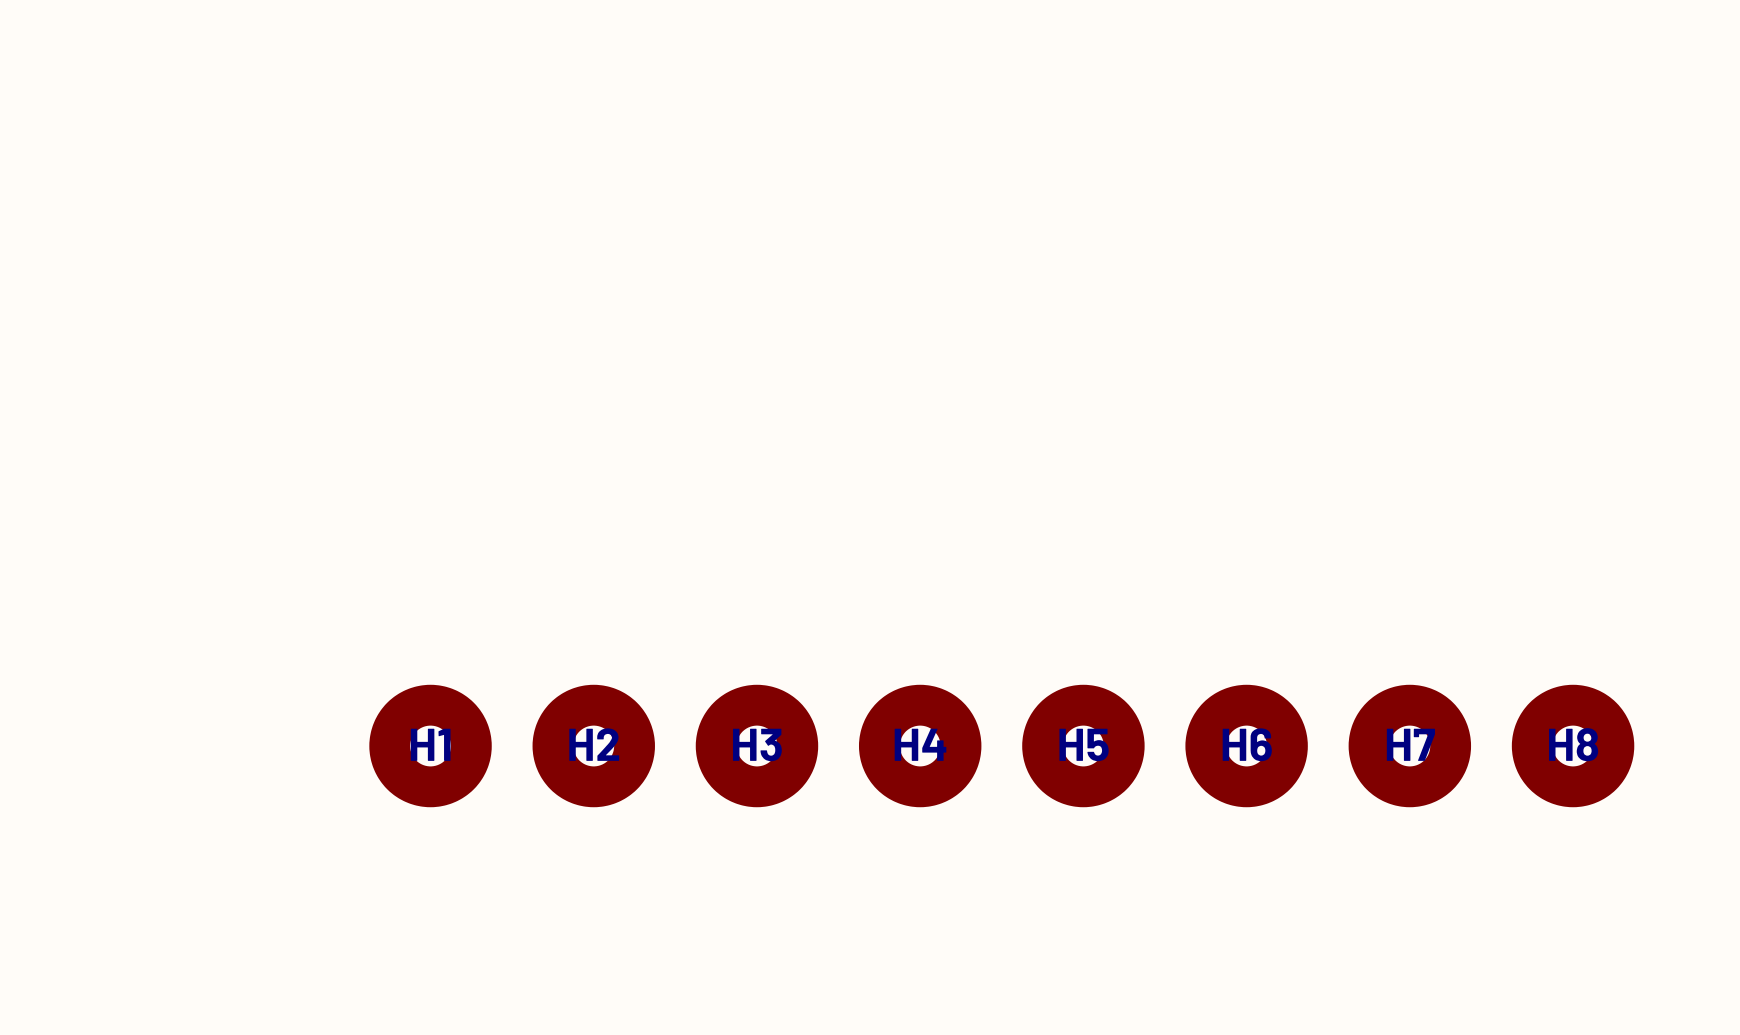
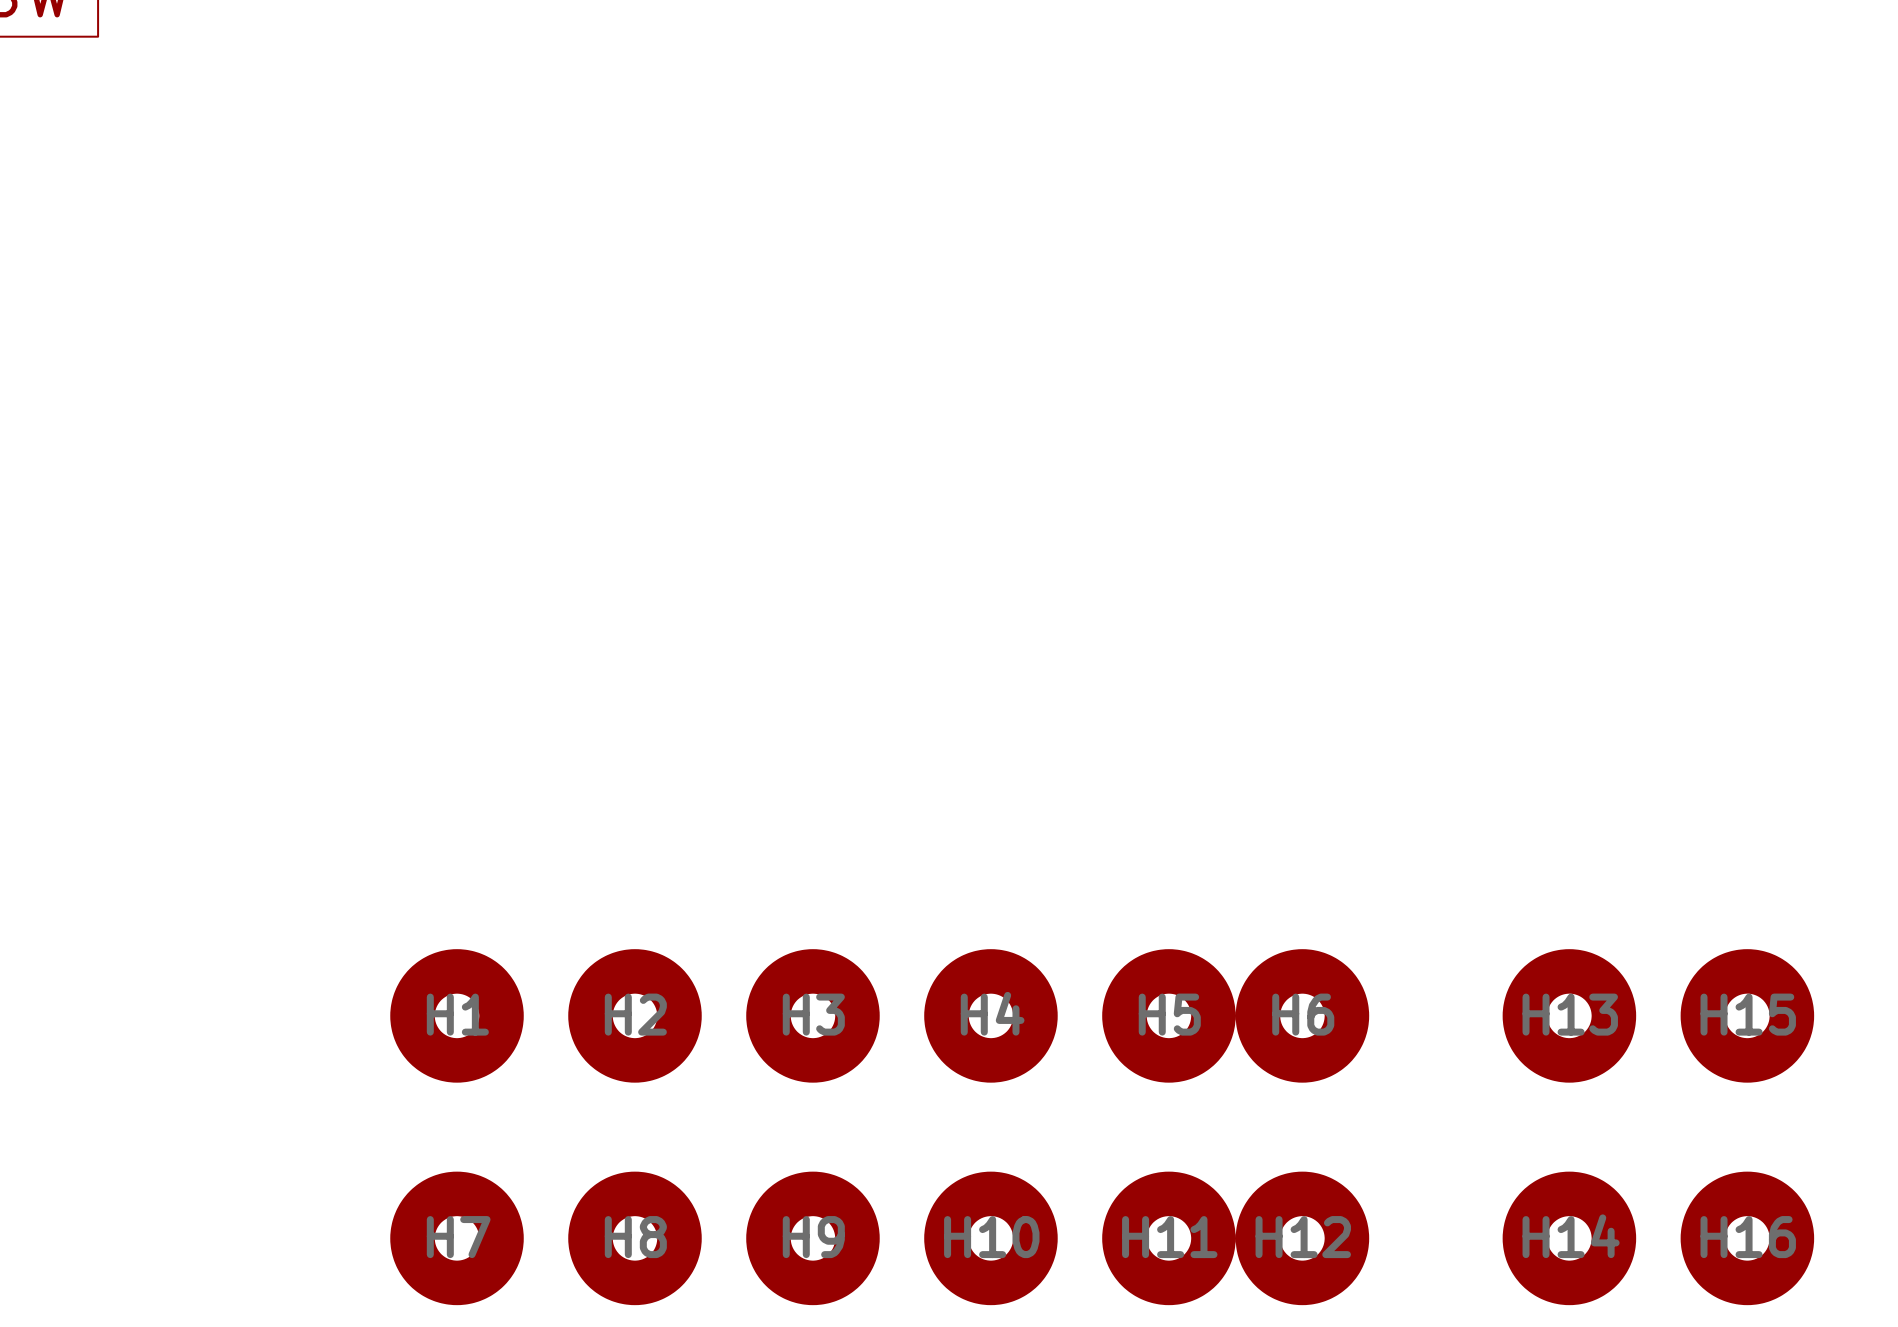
H6 position: (1246, 746) -> (1302, 1015)
H7 position: (1409, 746) -> (457, 1238)
H13: none -> (1569, 1015)
H8 position: (1573, 746) -> (634, 1238)
H15: none -> (1747, 1015)
H9: none -> (812, 1238)
H10: none -> (990, 1238)
H11: none -> (1168, 1238)
H12: none -> (1302, 1238)
H14: none -> (1569, 1238)
H16: none -> (1747, 1238)

